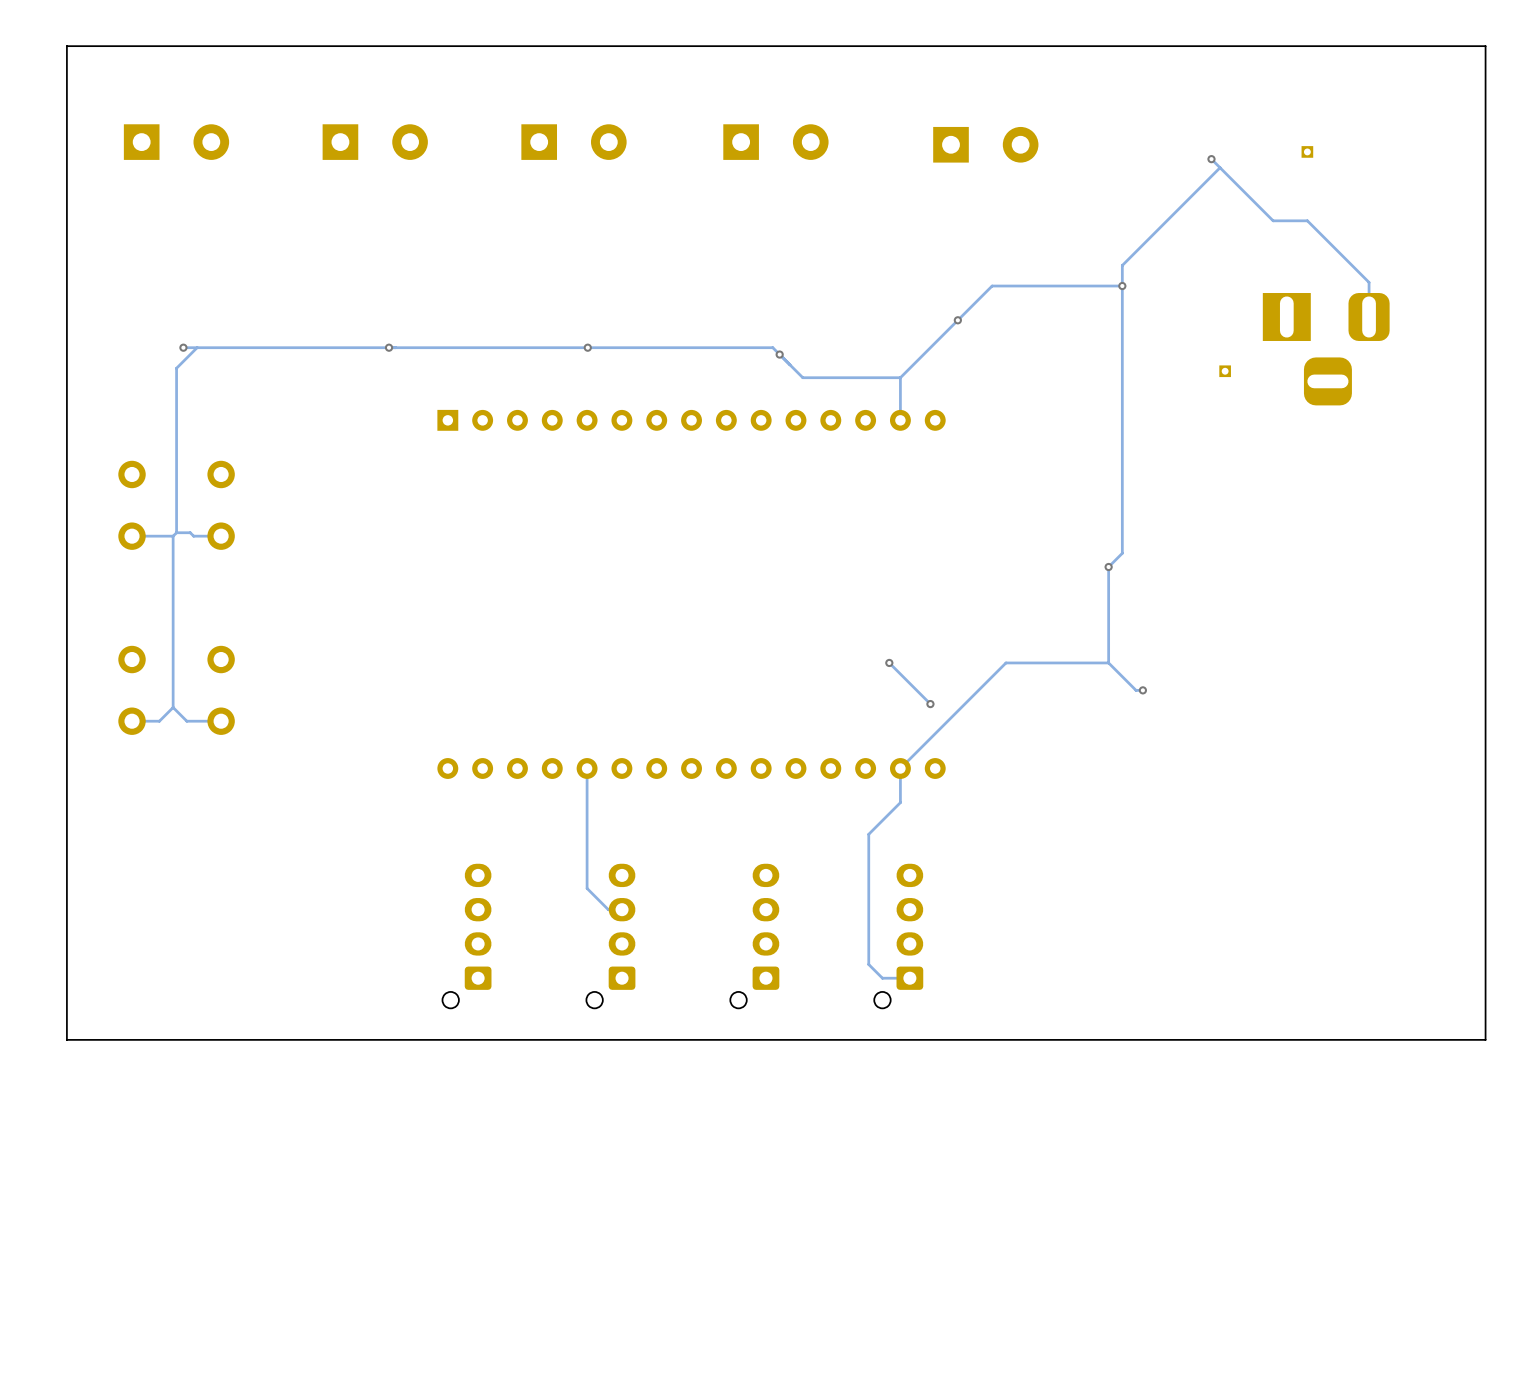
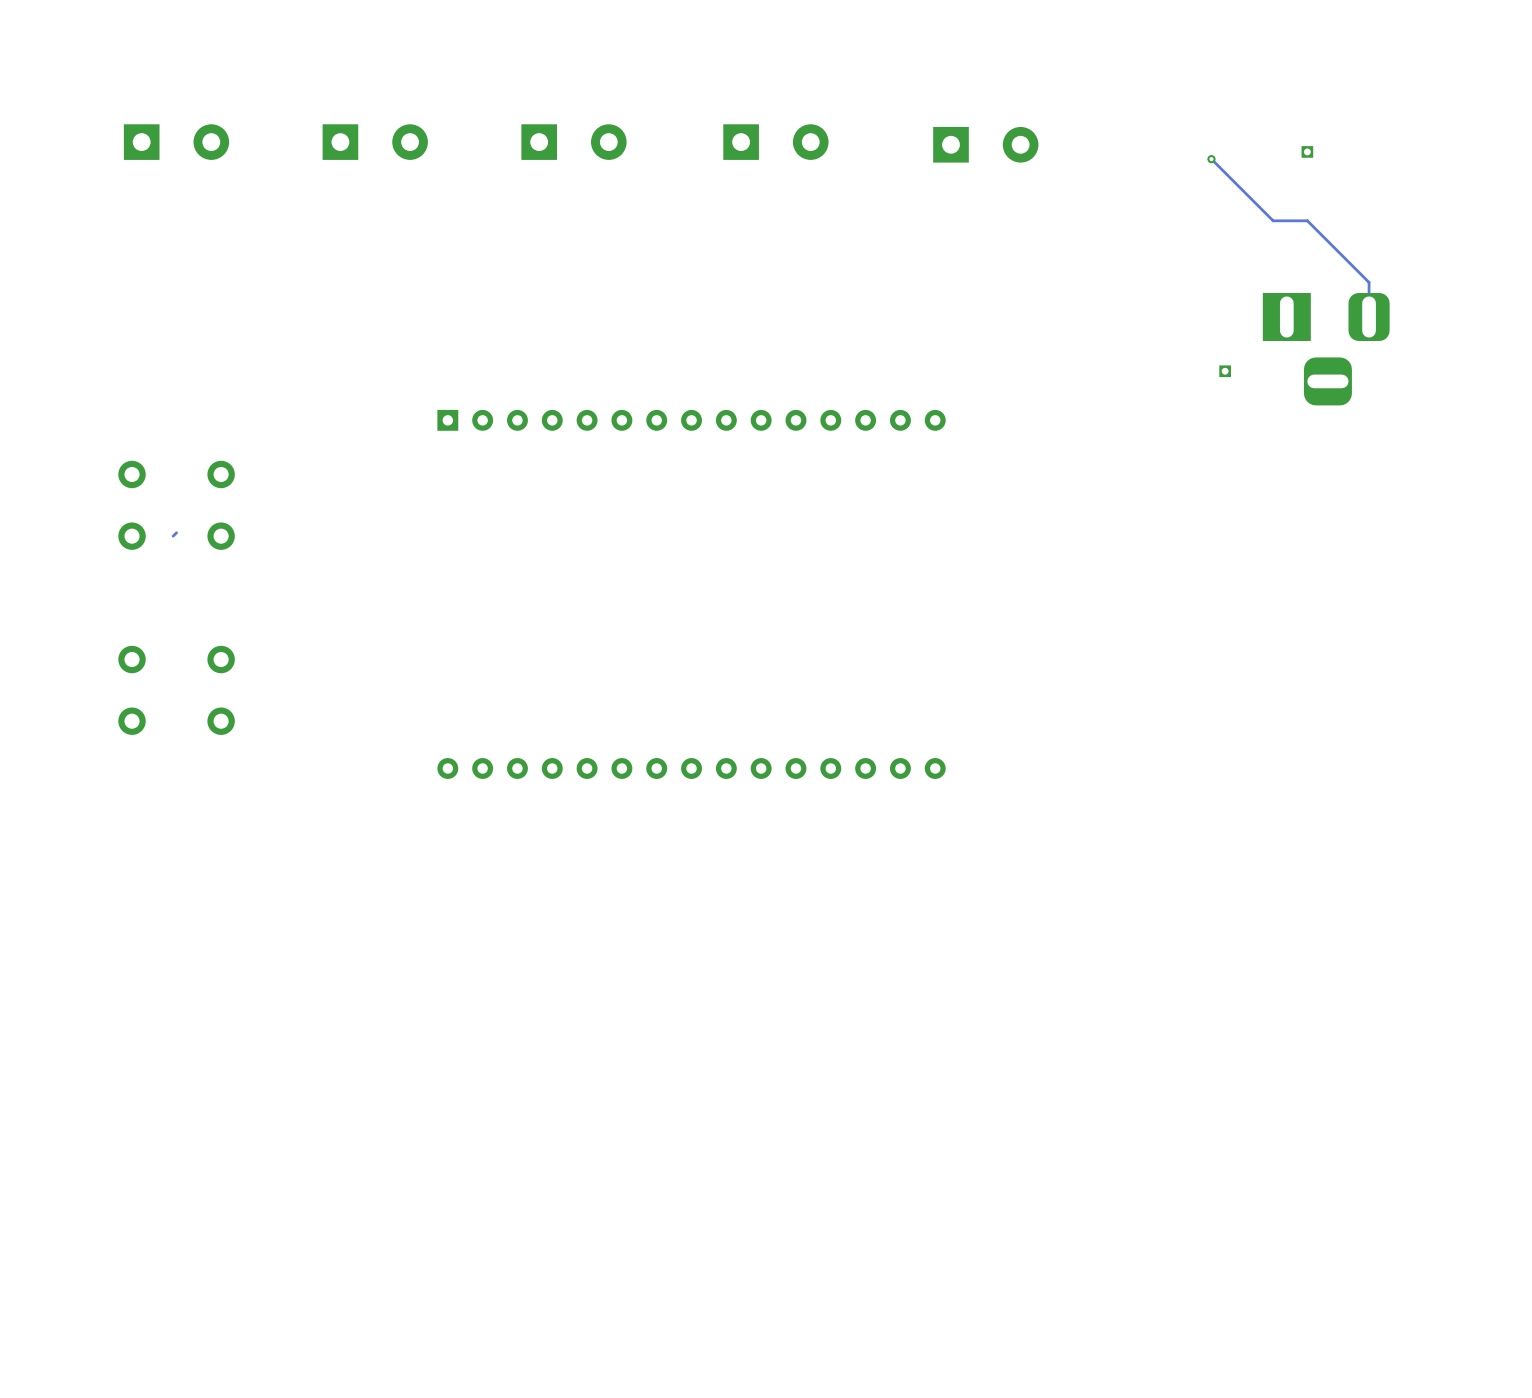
board edge: (1485, 46) (66, 46) (66, 1039) (1485, 1039) (1485, 46) -> none
track: (1220, 167) (1122, 265) (1122, 553) (1108, 567) (1108, 662) -> none
track: (1122, 286) (992, 286) (900, 377) -> none
via: (1122, 286) -> none
via: (957, 320) -> none
track: (183, 347) (772, 347) (802, 377) (900, 377) -> none
via: (183, 347) -> none
track: (197, 347) (176, 368) (176, 532) (190, 532) (193, 536) (221, 536) -> none
via: (389, 347) -> none
via: (587, 347) -> none
via: (779, 354) -> none
track: (900, 377) (900, 420) -> none
track: (132, 536) (173, 536) (173, 707) -> none
via: (1108, 567) -> none
track: (889, 662) (930, 704) -> none
via: (889, 662) -> none
track: (1108, 662) (1005, 662) (900, 768) (900, 802) (868, 834) (868, 964) (882, 978) (909, 978) -> none
track: (1108, 662) (1136, 690) (1142, 690) -> none
via: (1142, 690) -> none
via: (930, 704) -> none
track: (173, 707) (159, 721) (132, 721) -> none
track: (173, 707) (186, 721) (221, 721) -> none
track: (587, 768) (587, 888) (608, 909) (622, 909) -> none
part: (466, 936) -> none
part: (610, 936) -> none
part: (754, 936) -> none
part: (898, 936) -> none

